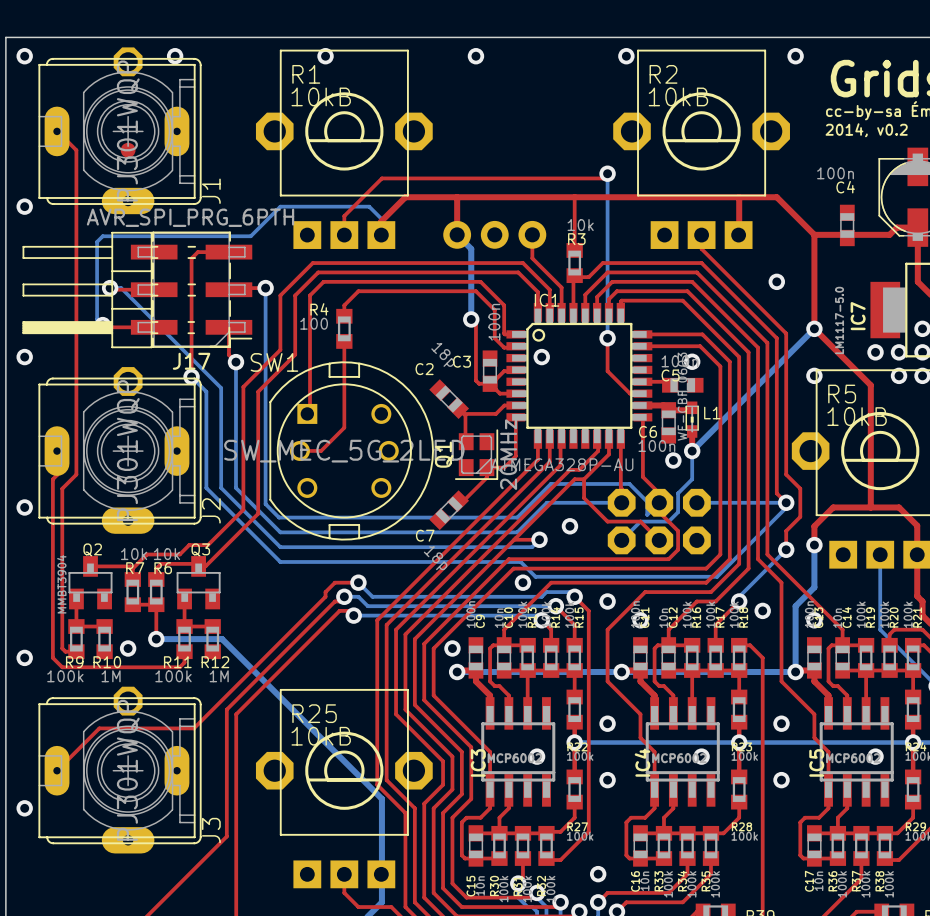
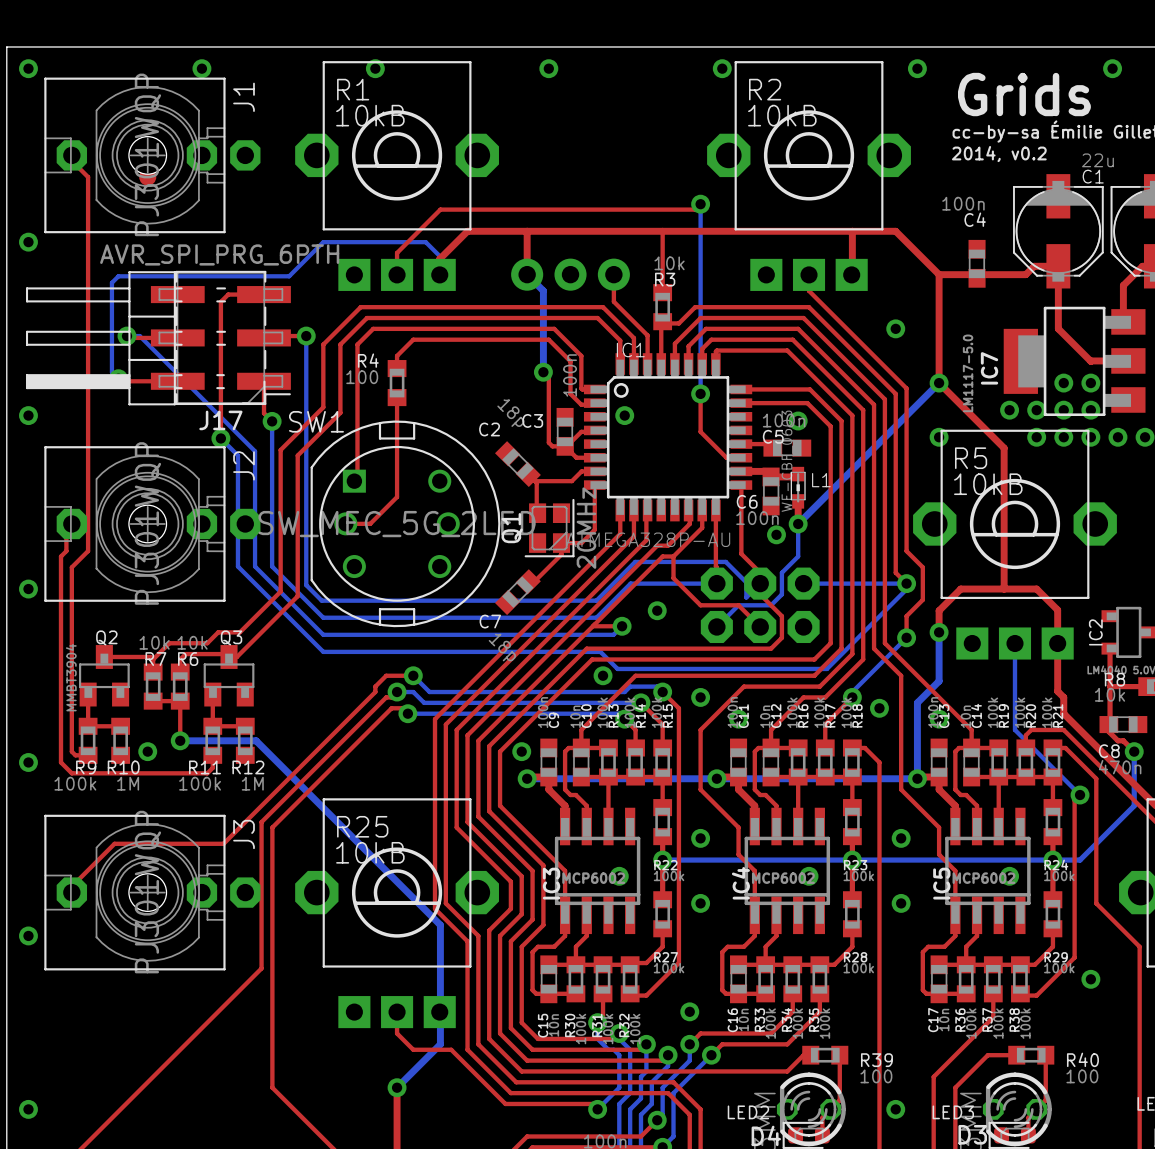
J1 footprint: [38, 47, 202, 215] -> [44, 77, 261, 234]
J1 name position: J1 (211, 191) -> J1 (244, 97)
J2 footprint: [38, 367, 202, 534] -> [44, 446, 261, 602]
J2 name position: J2 (211, 510) -> J2 (244, 465)
J3 footprint: [38, 686, 202, 854] -> [44, 814, 261, 971]
J3 name position: J3 (211, 830) -> J3 (244, 834)

